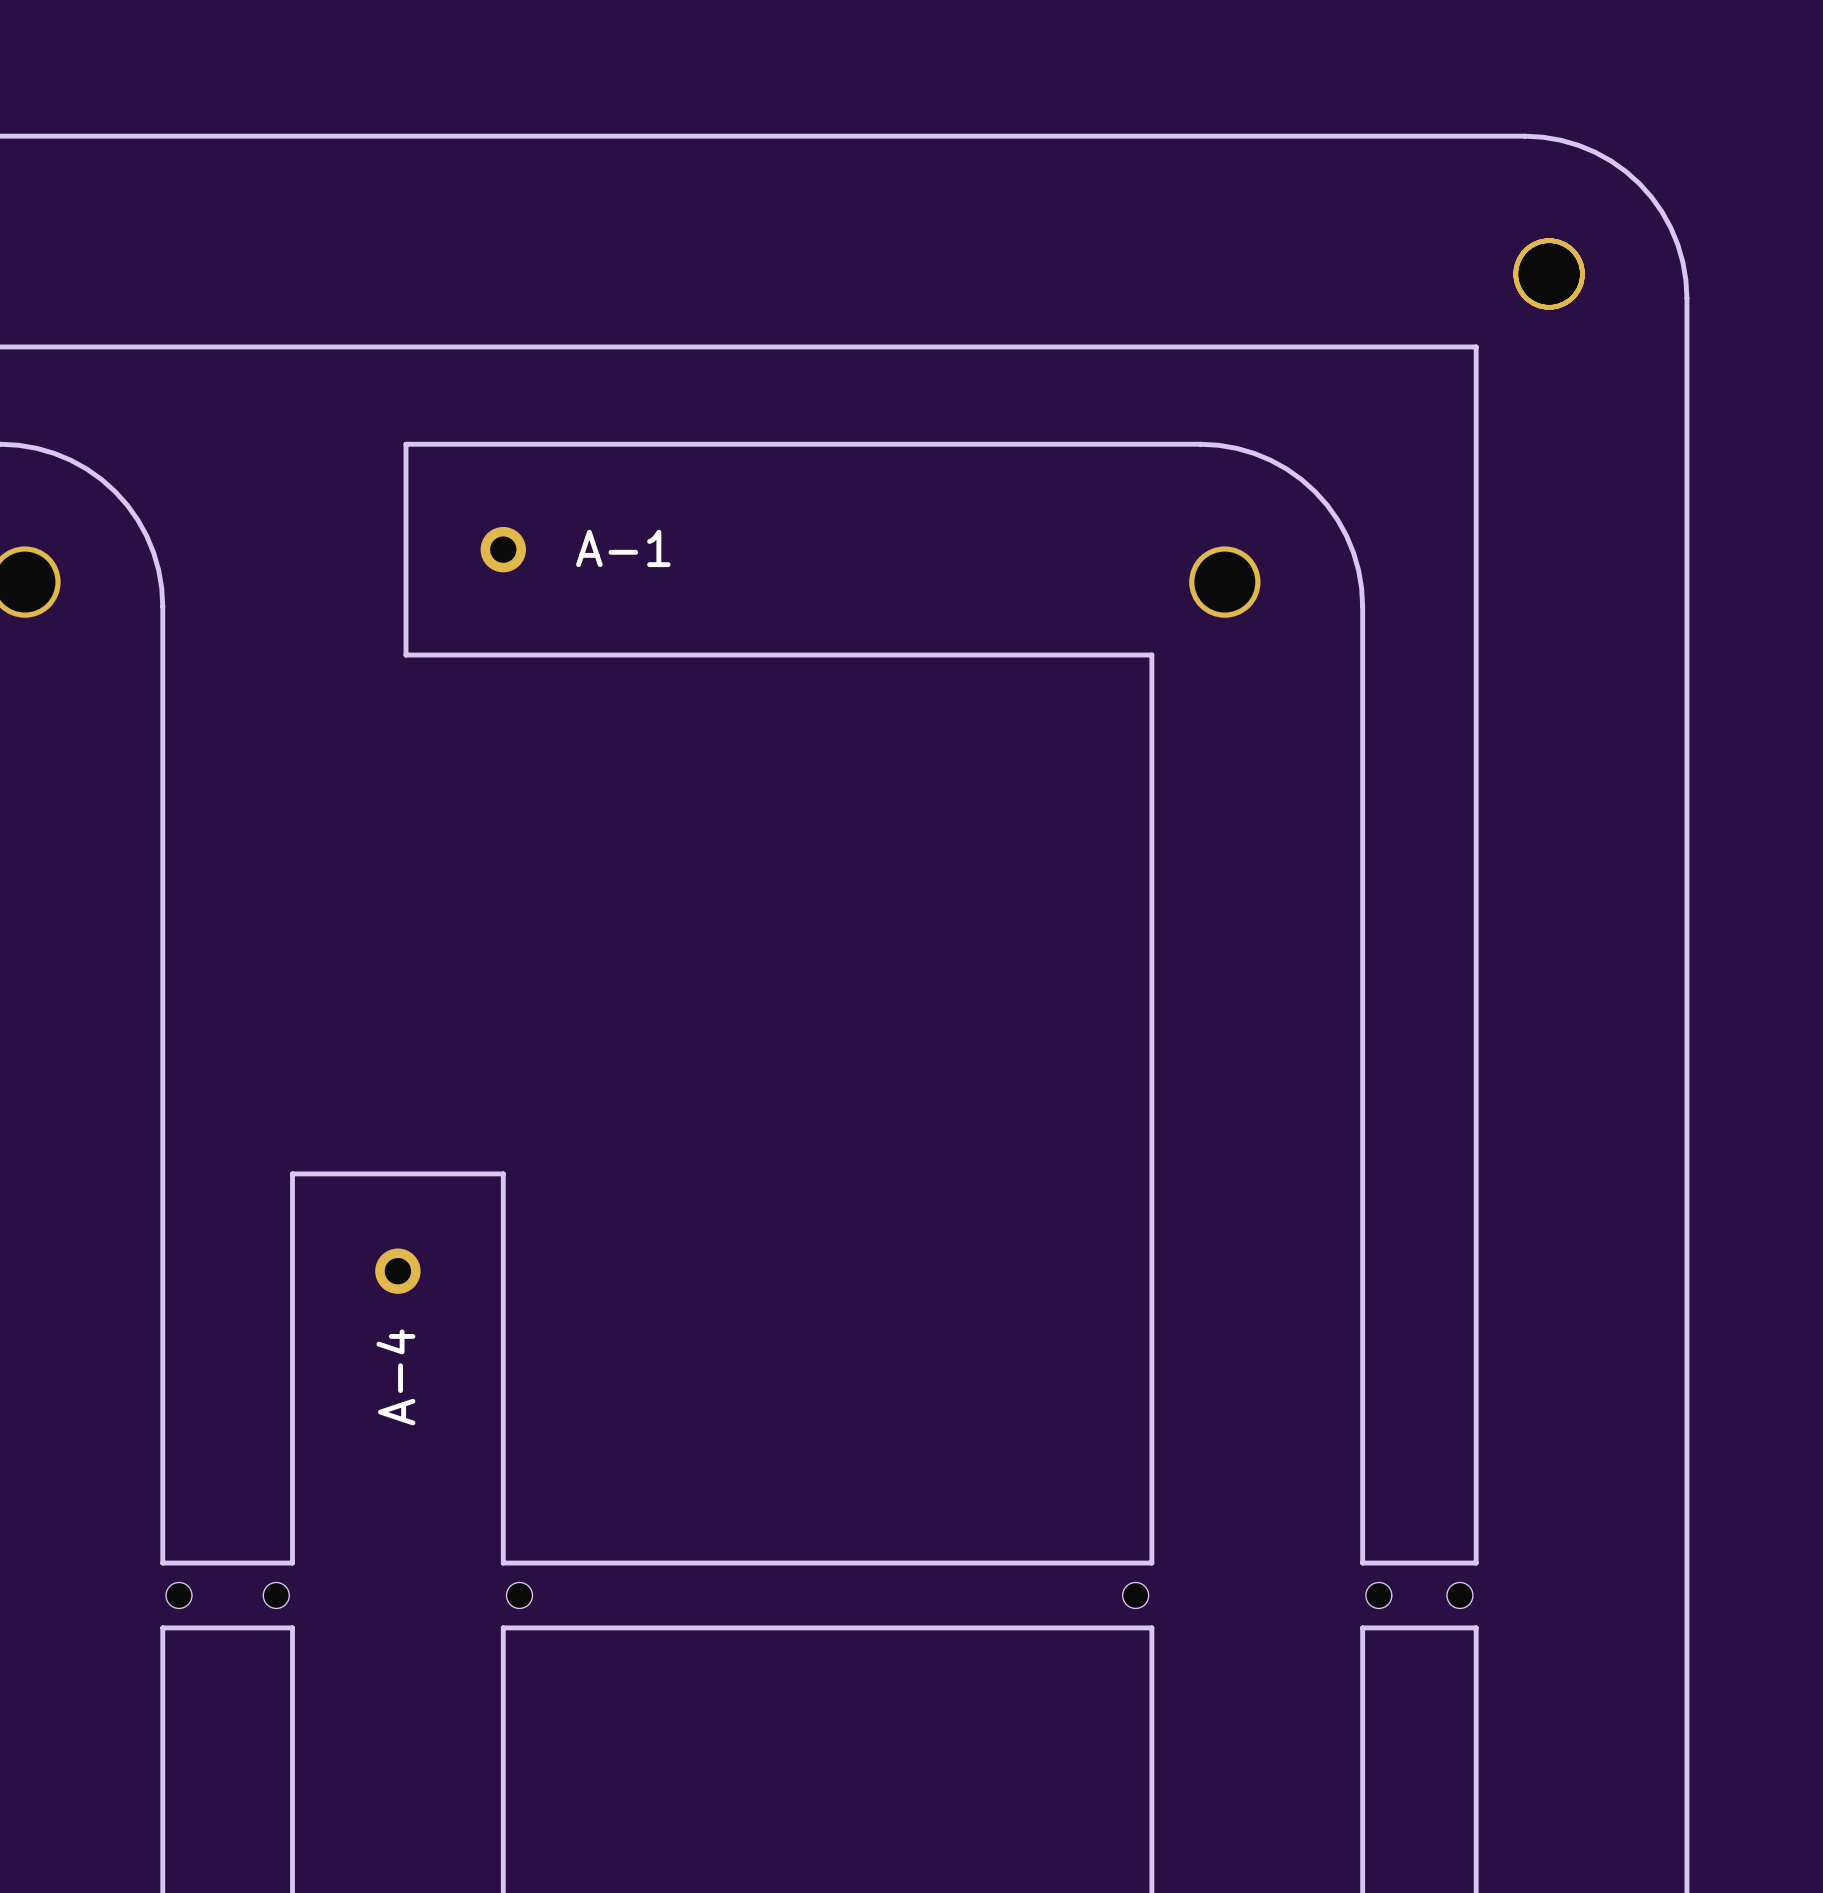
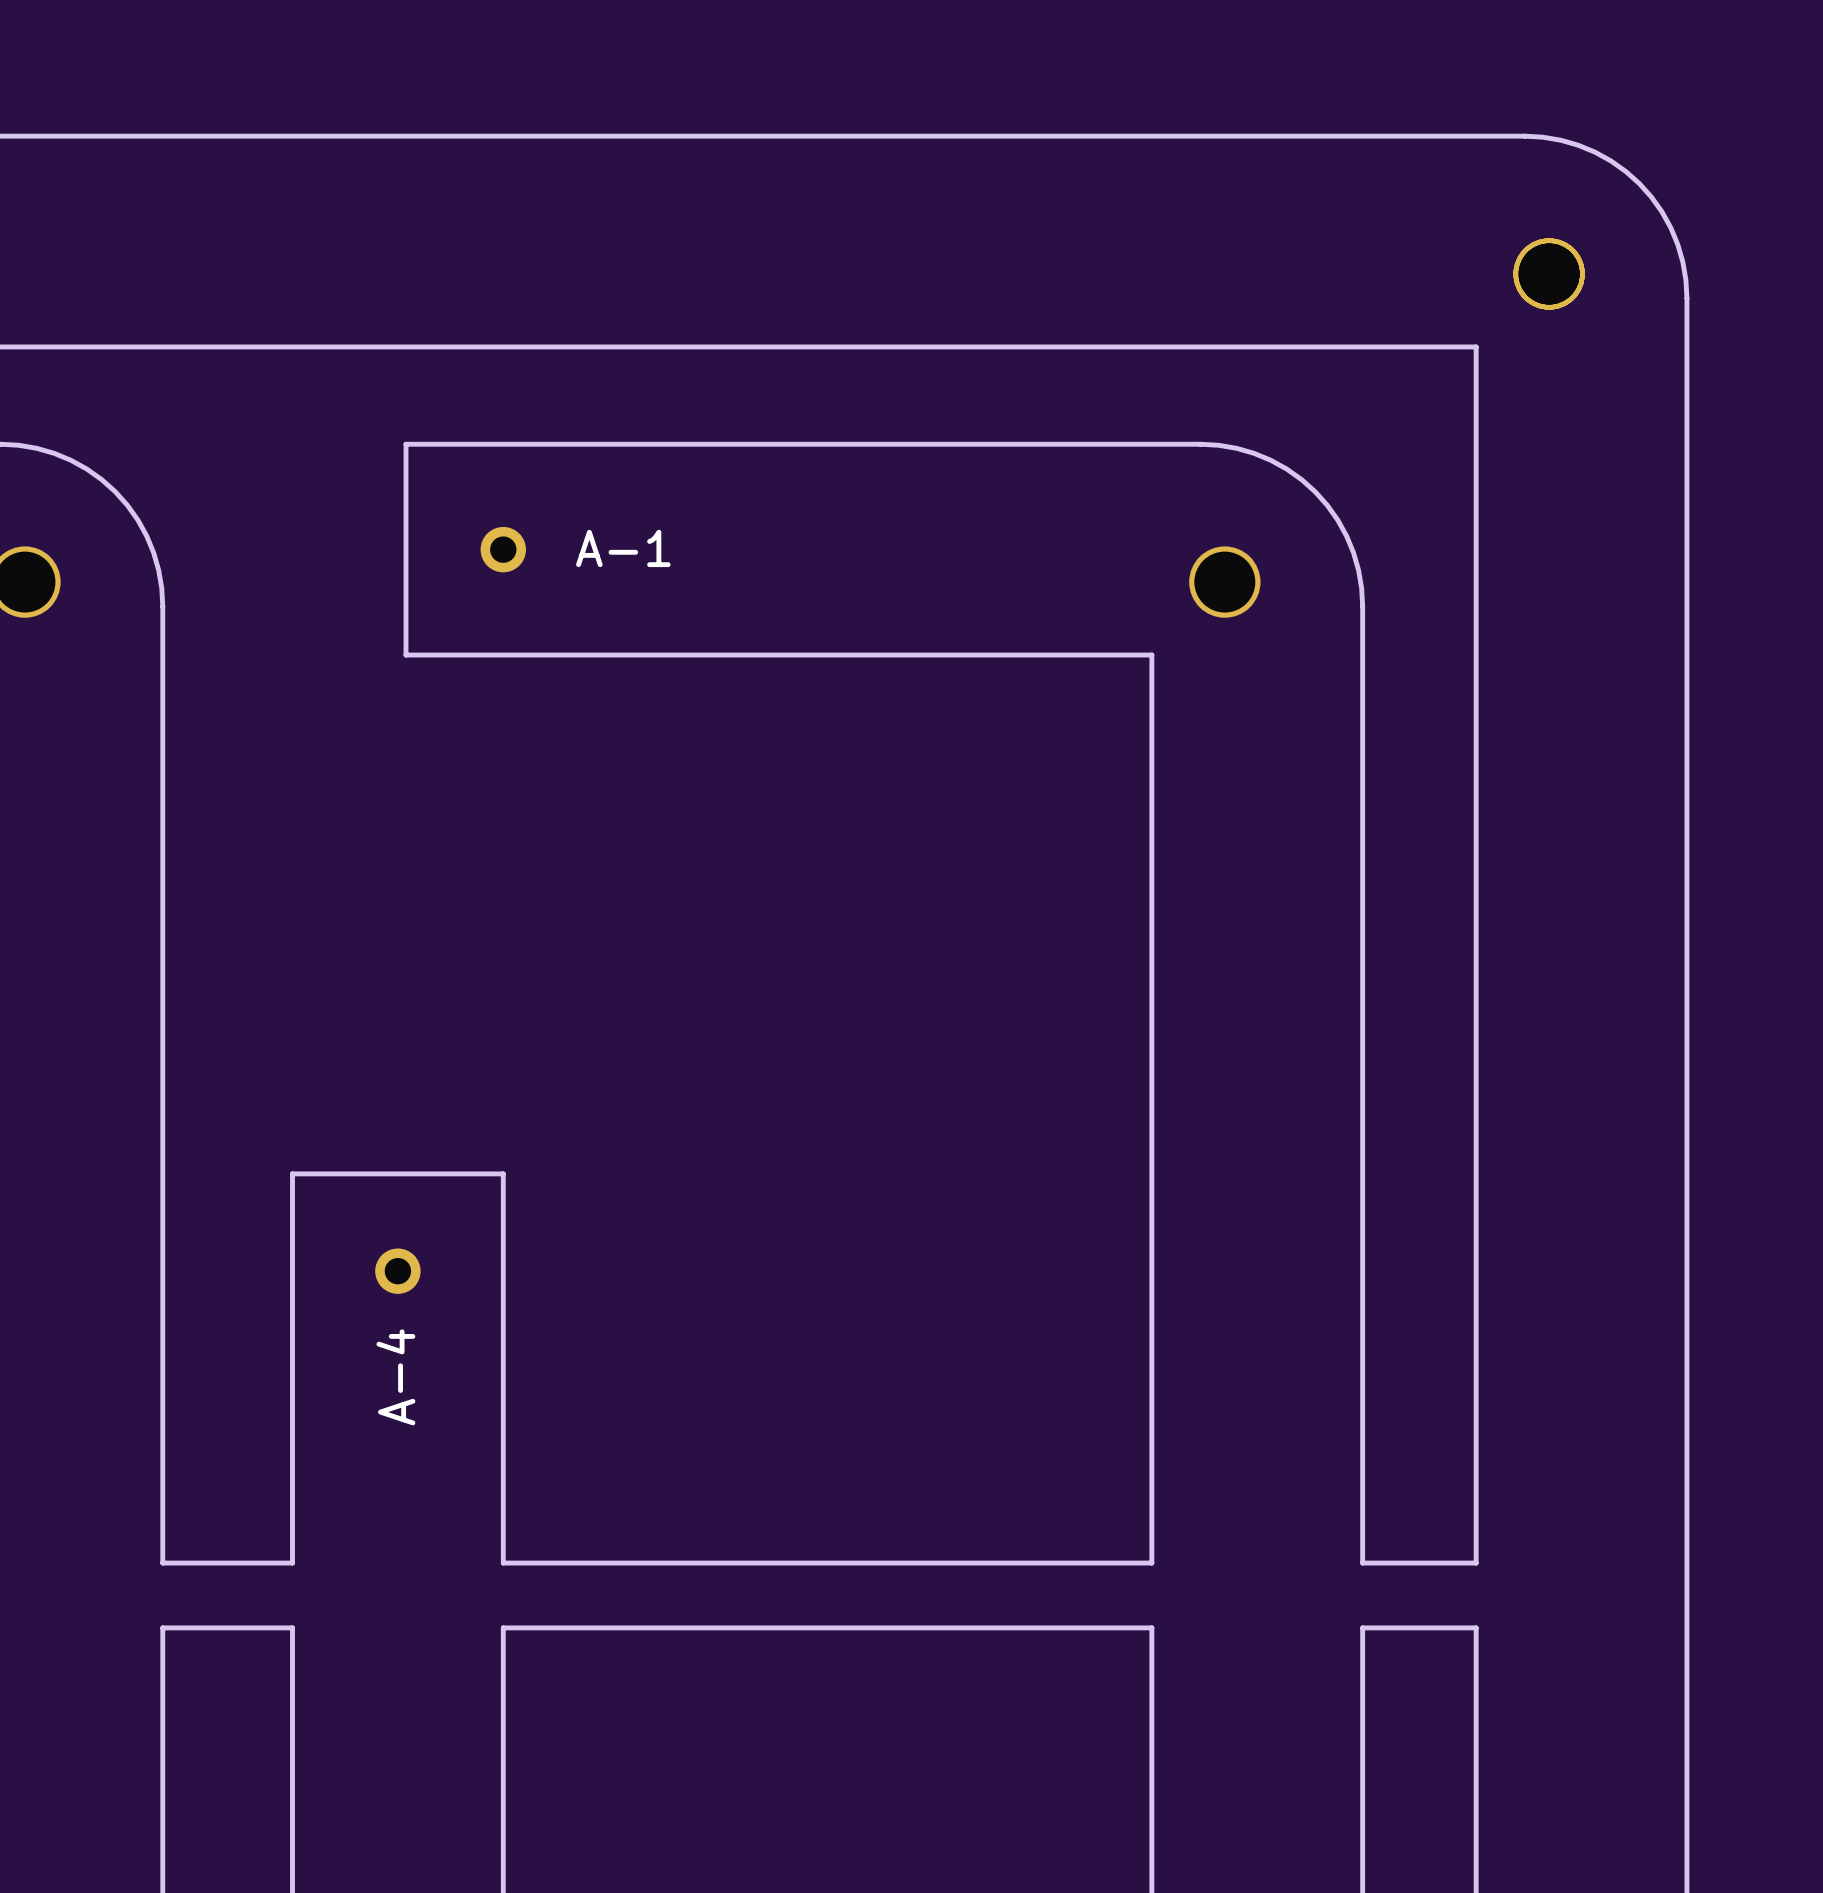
part: (179, 1595) -> none
part: (276, 1595) -> none
part: (519, 1595) -> none
part: (1135, 1595) -> none
part: (1378, 1595) -> none
part: (1459, 1595) -> none

